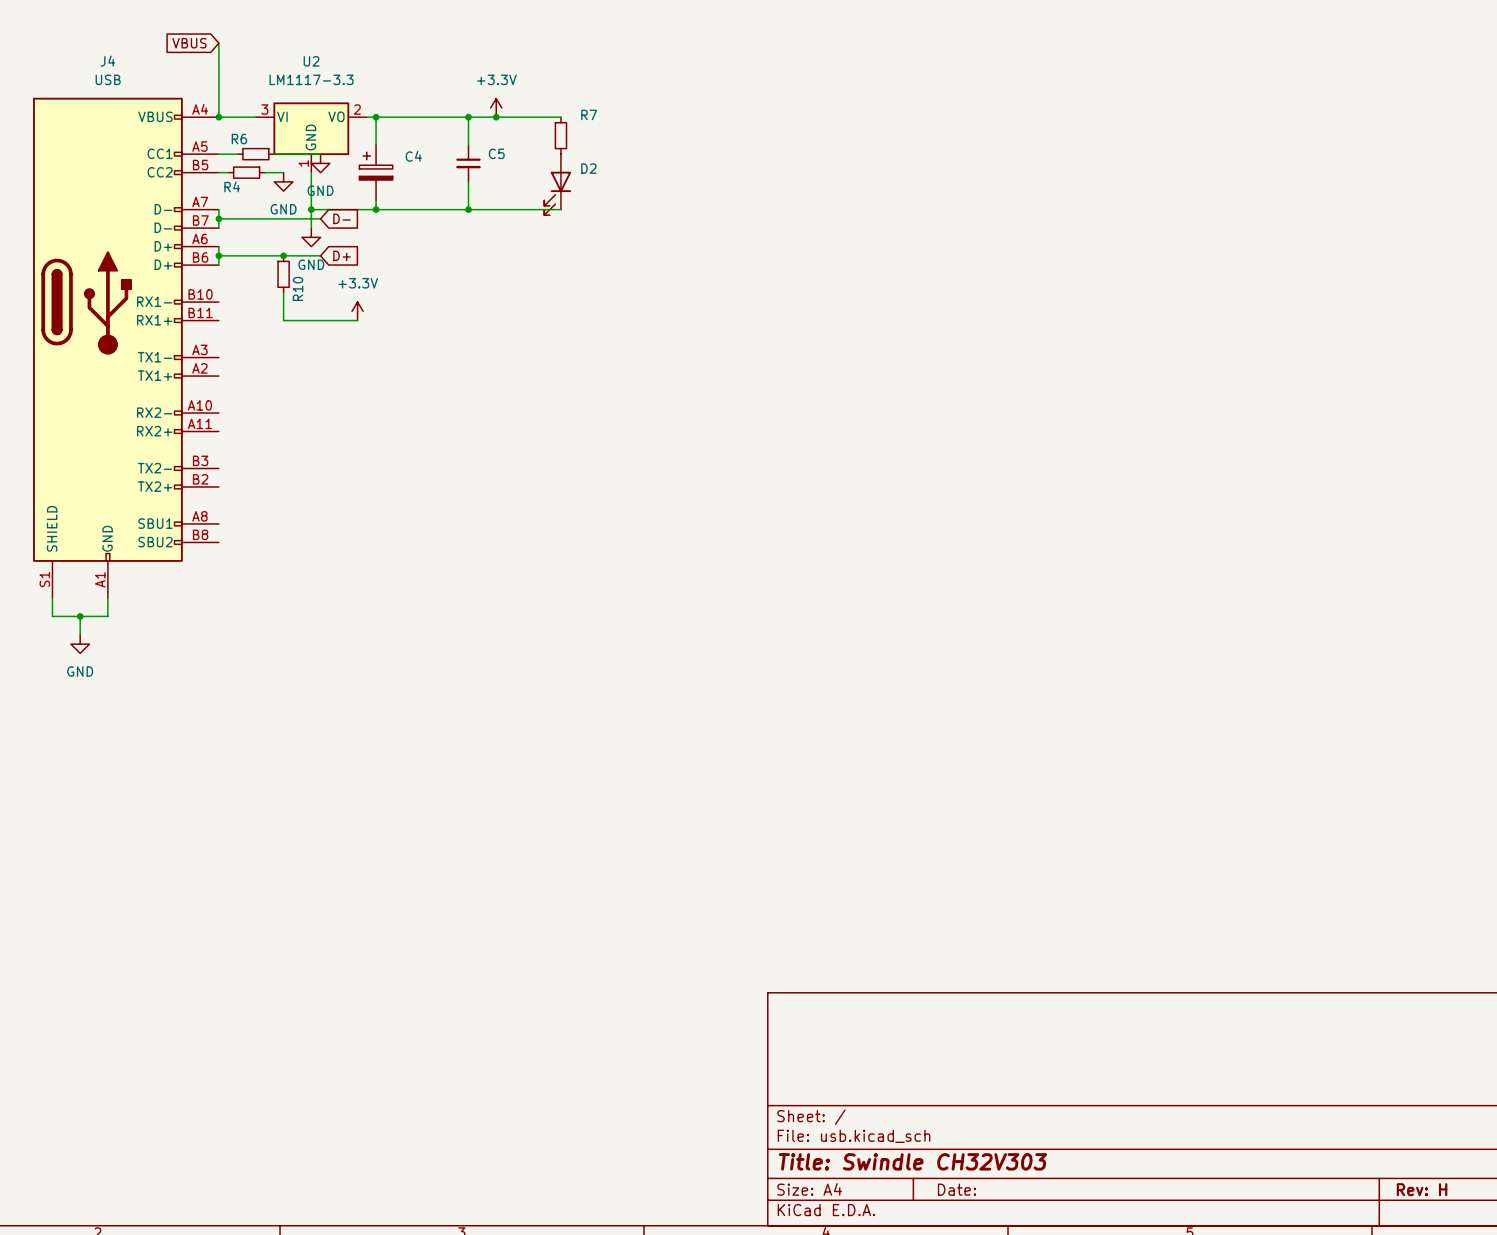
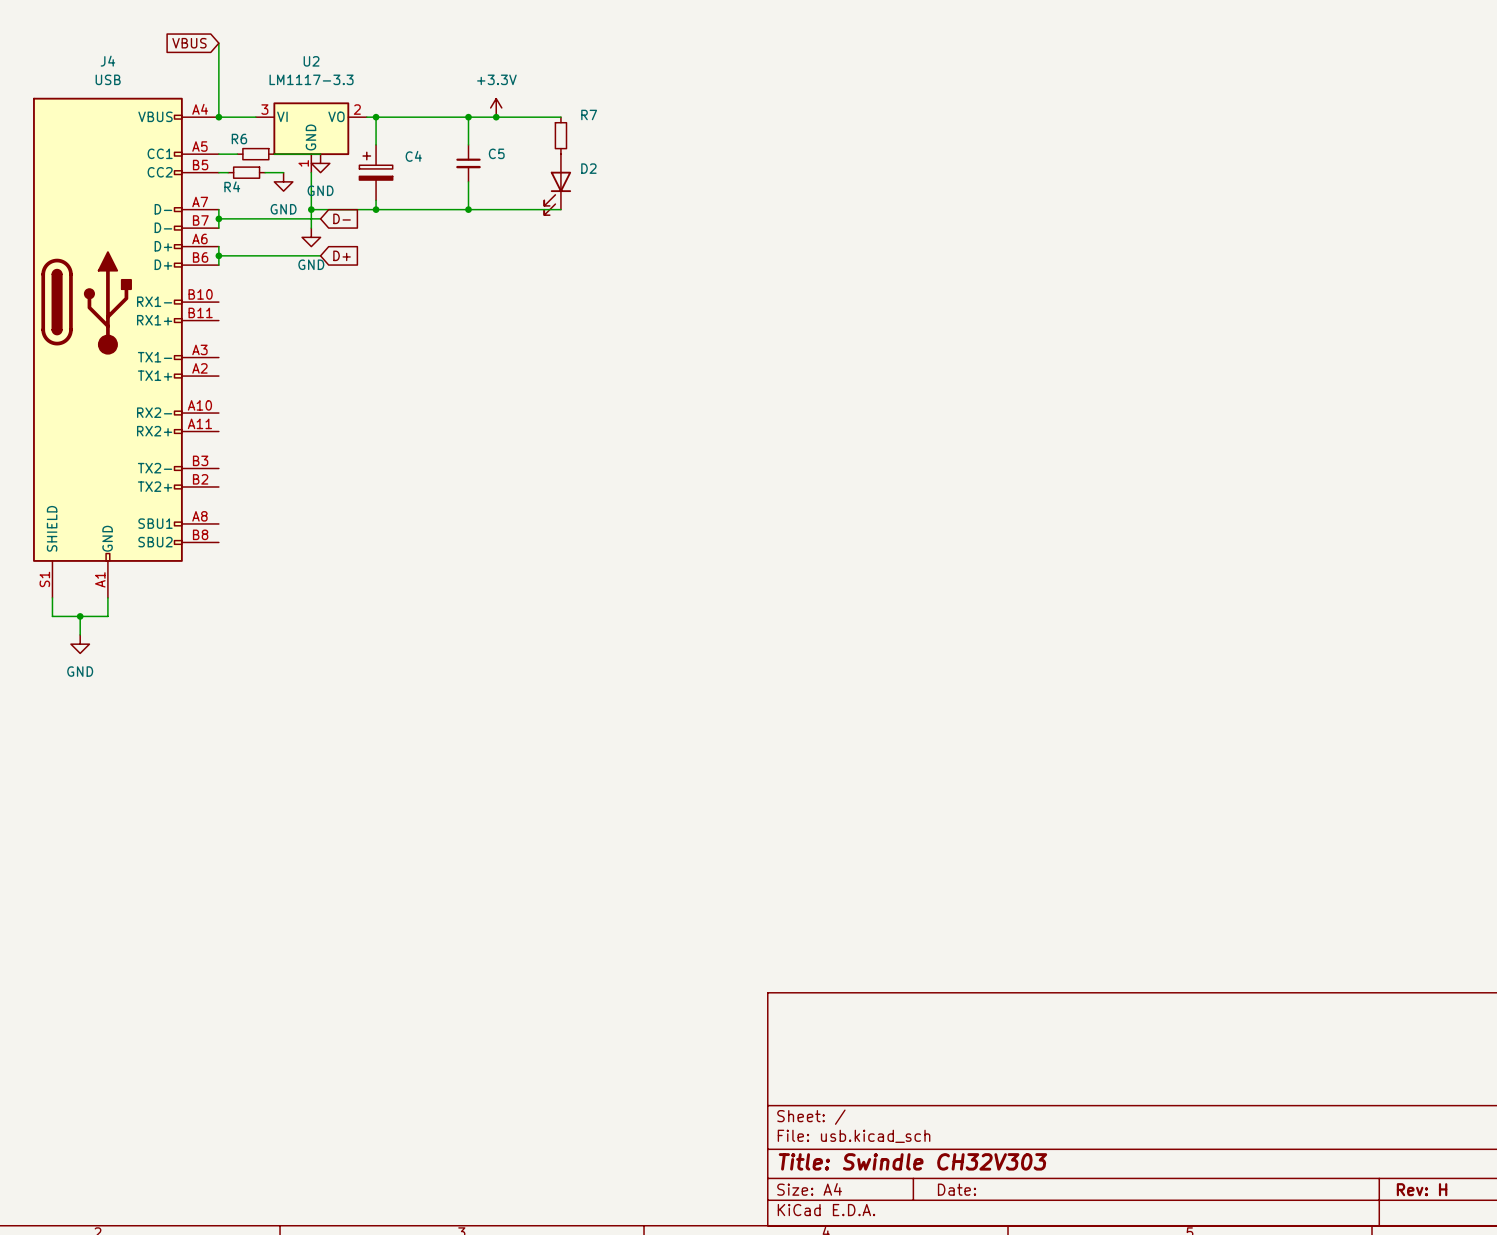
junction: (283, 255) -> none
R10: (283, 274) -> none
wire: (283, 292) (283, 320) (357, 320) -> none
power symbol: +3.3V (357, 311) -> none

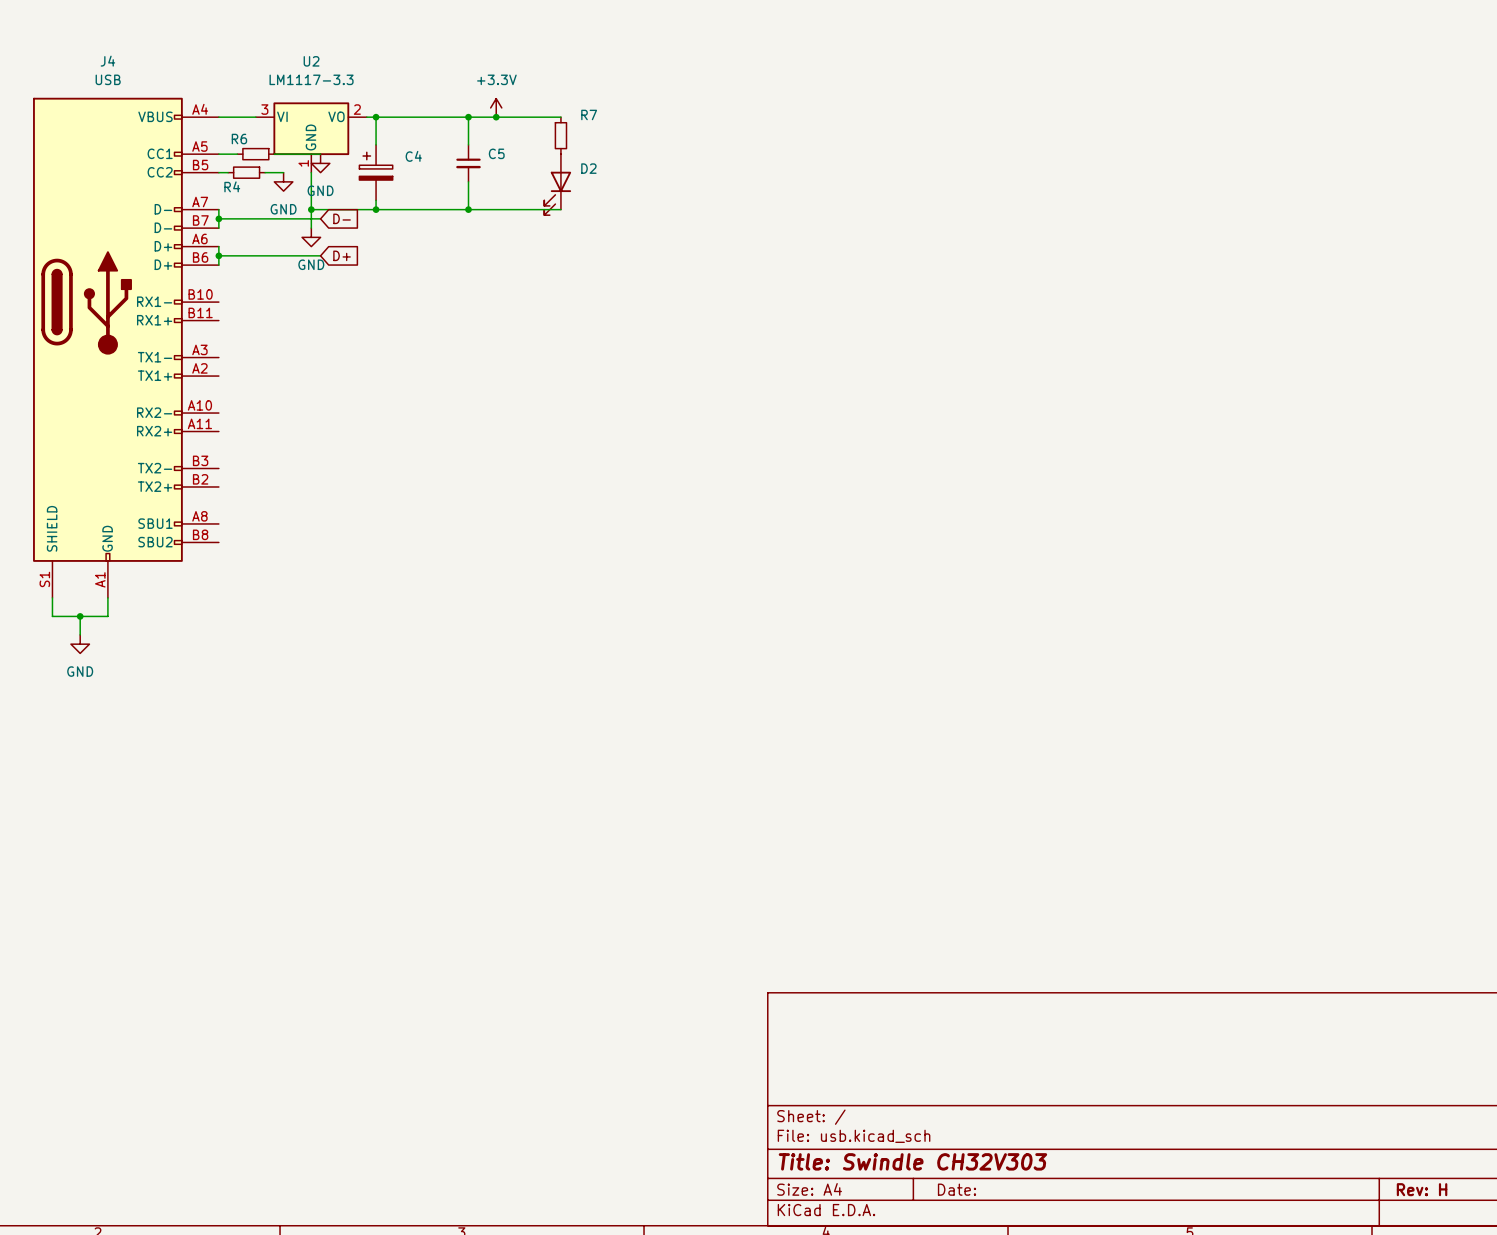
global label: VBUS (189, 43) -> none
wire: (218, 43) (218, 117) -> none
junction: (218, 117) -> none

